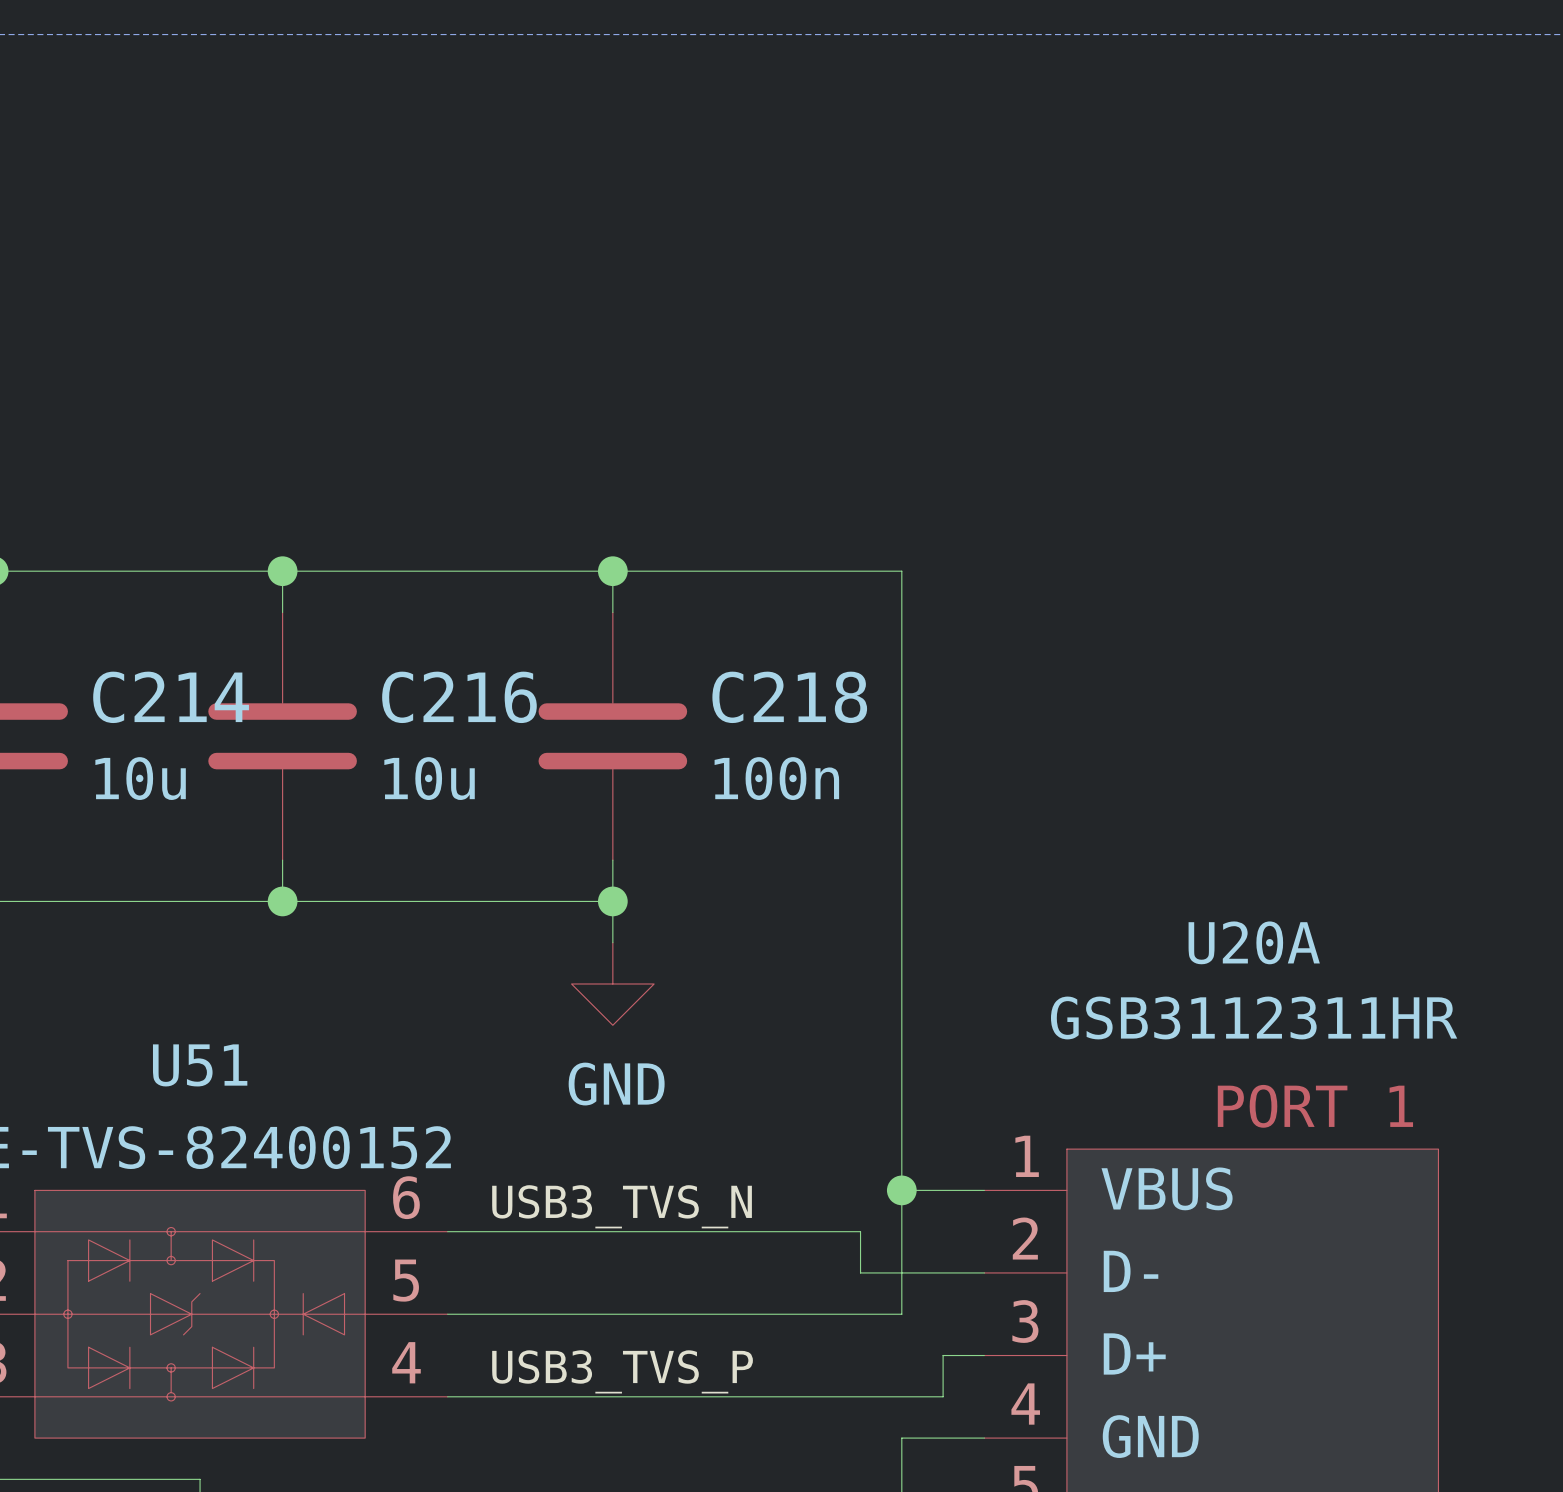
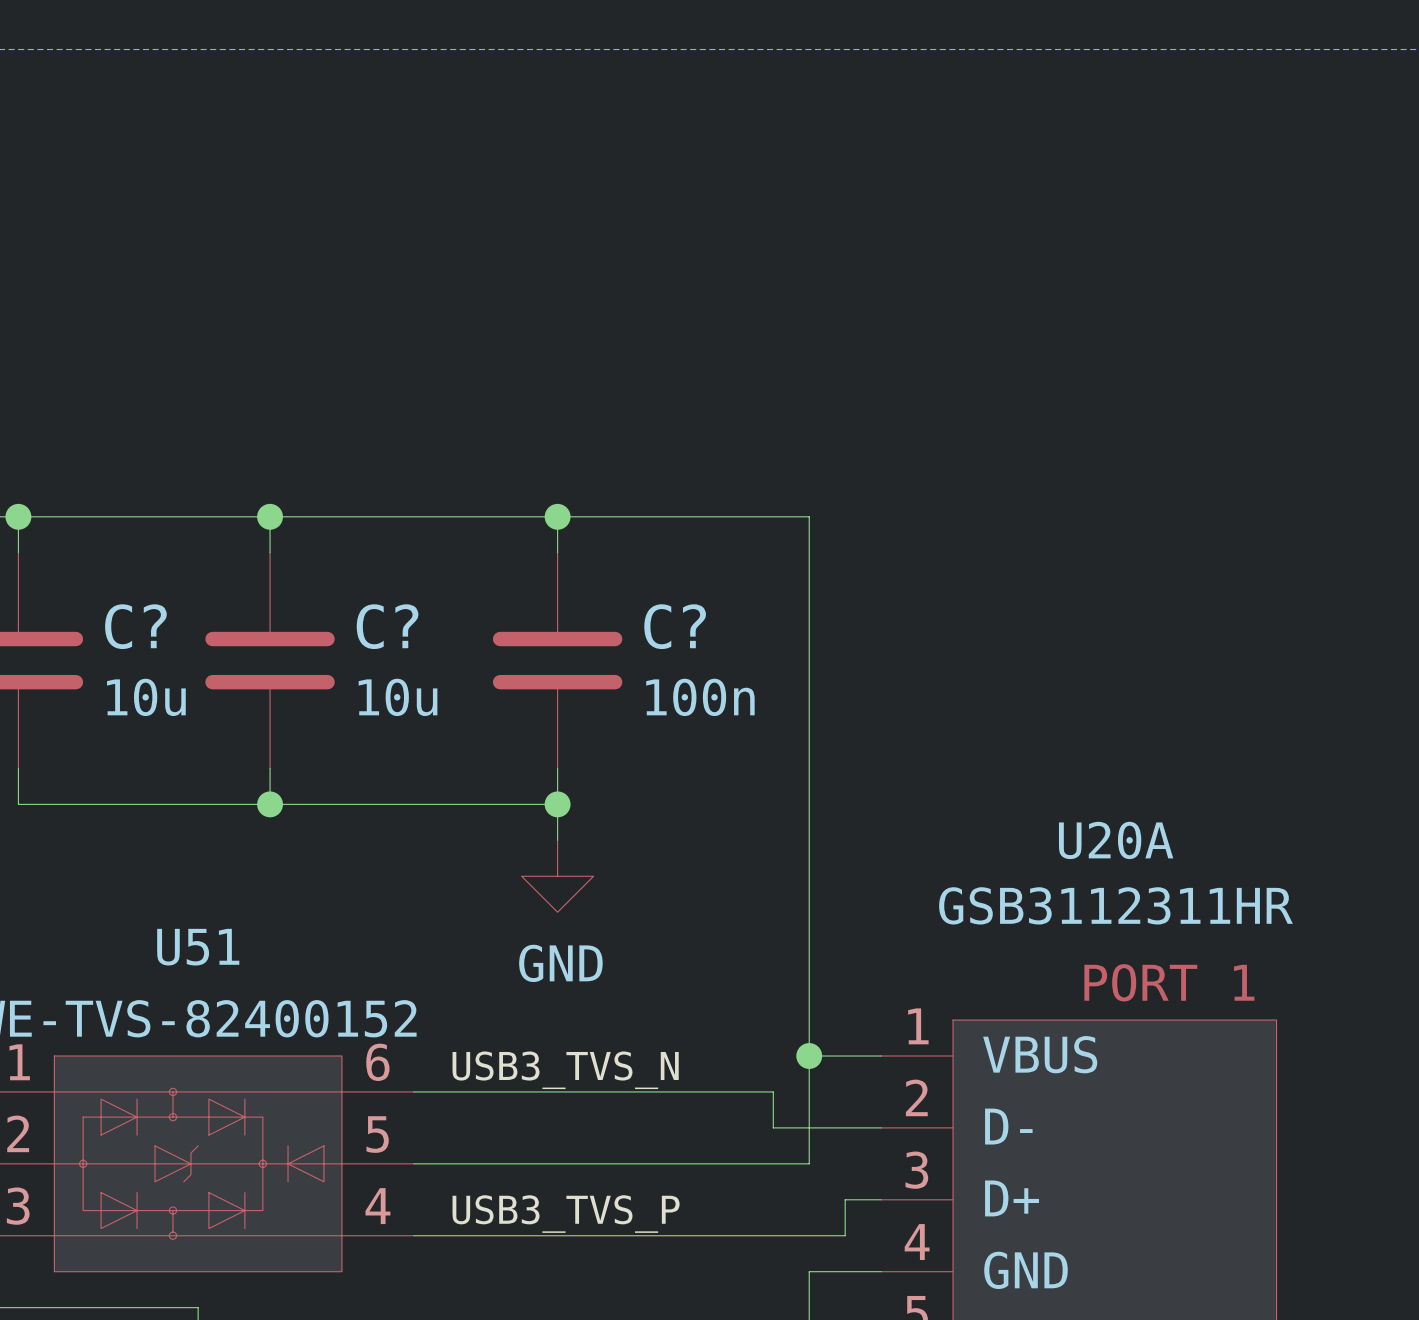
C214 name: C214 (171, 697) -> C? (135, 626)
C216 name: C216 (459, 697) -> C? (387, 626)
C218 name: C218 (789, 697) -> C? (675, 626)

